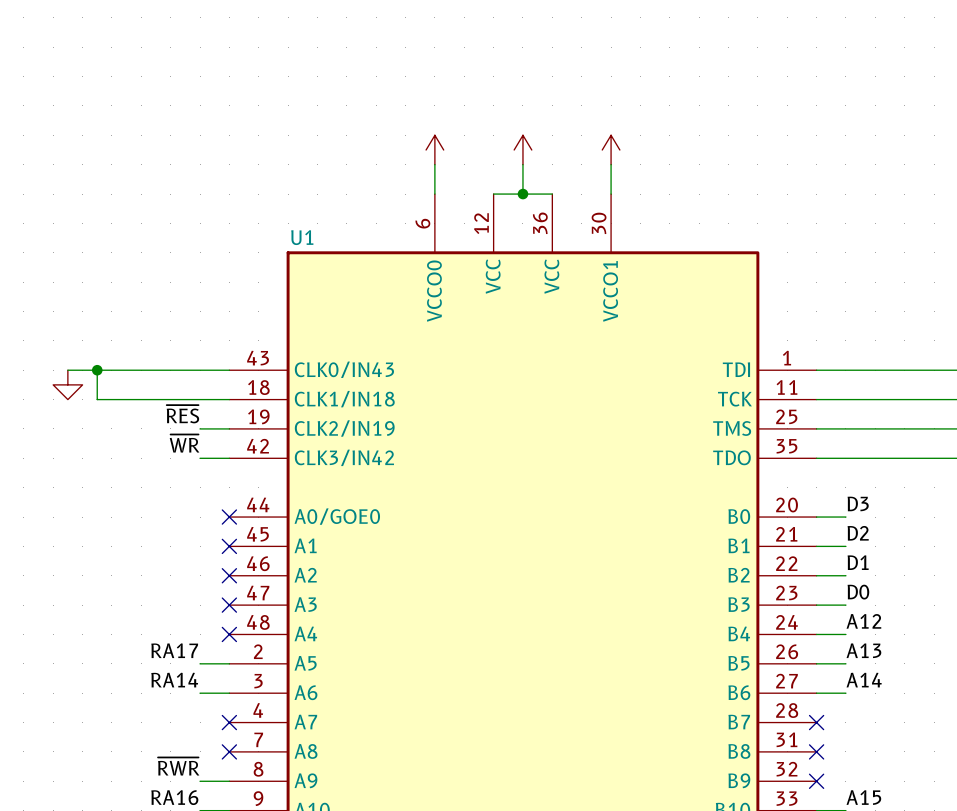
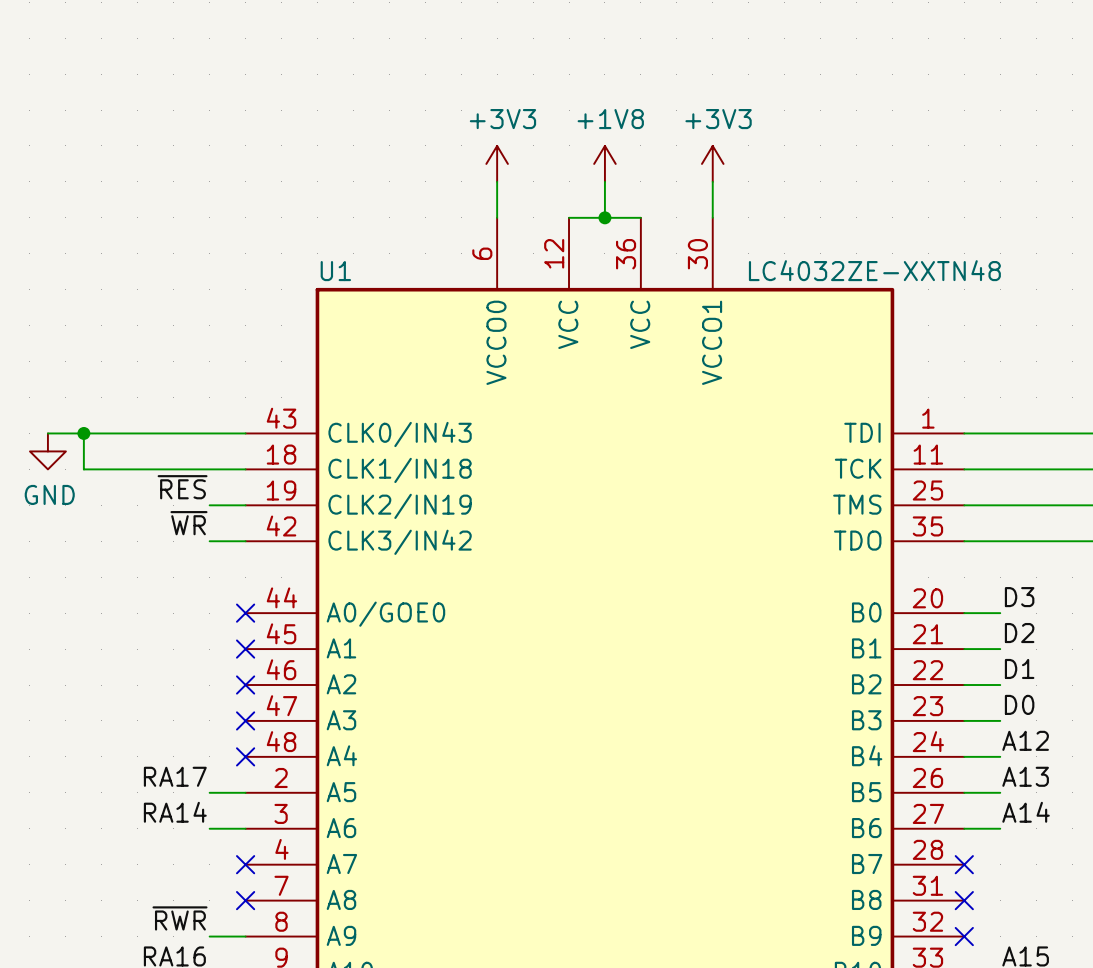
power symbol text: none -> +3V3 (502, 119)
power symbol text: none -> +1V8 (610, 119)
power symbol text: none -> +3V3 (718, 119)
U1 value: none -> LC4032ZE-XXTN48 (874, 270)
power symbol text: none -> GND (49, 494)

